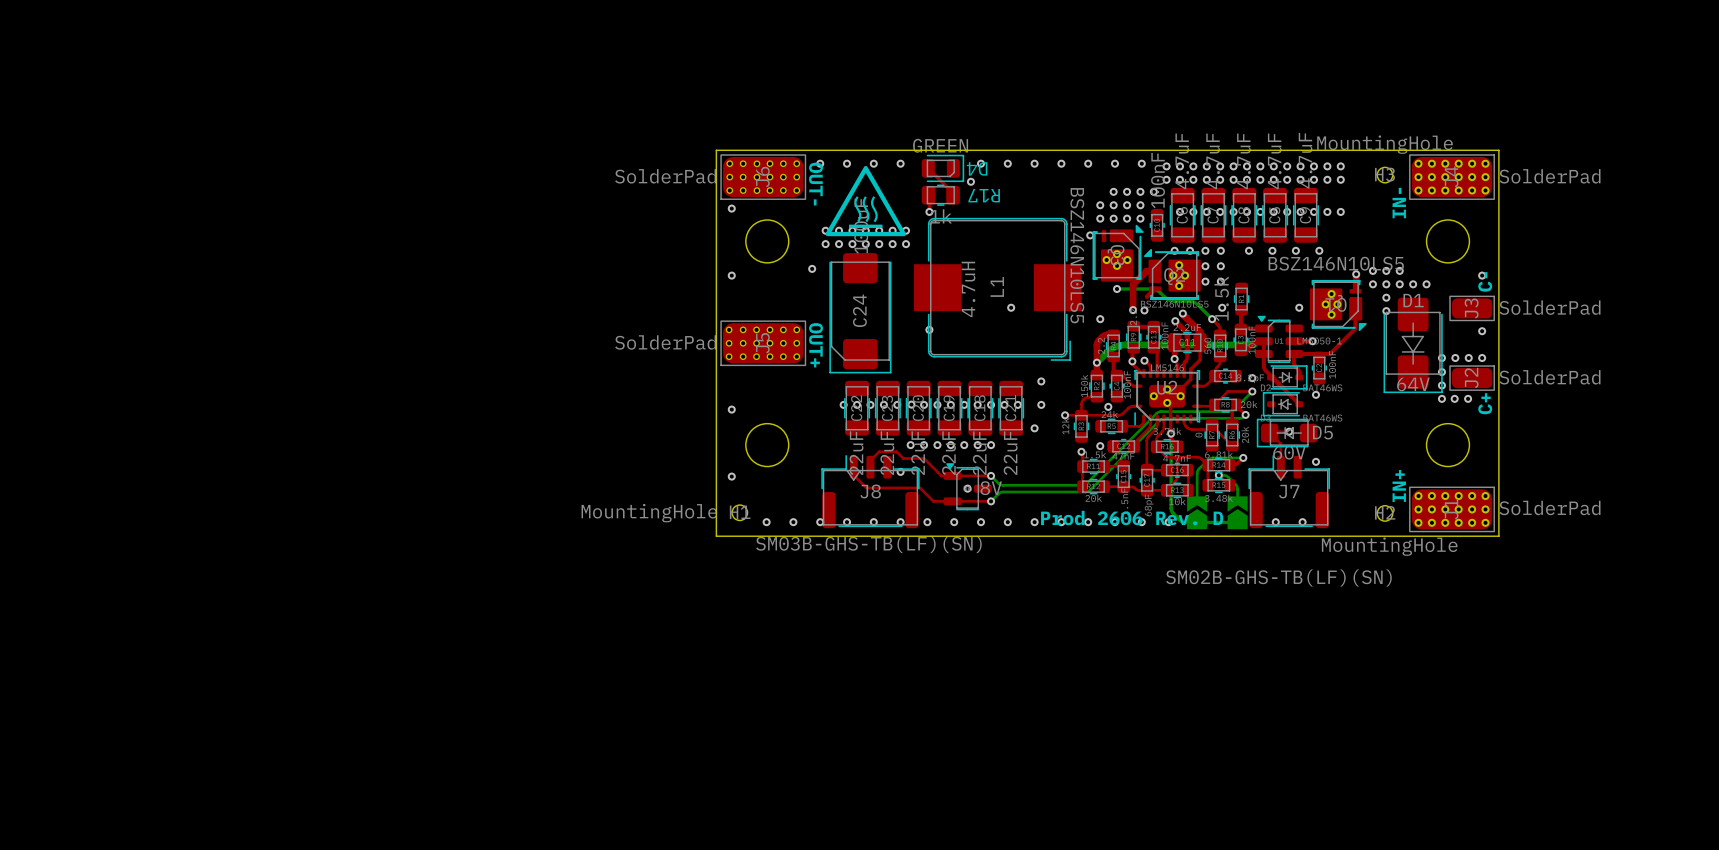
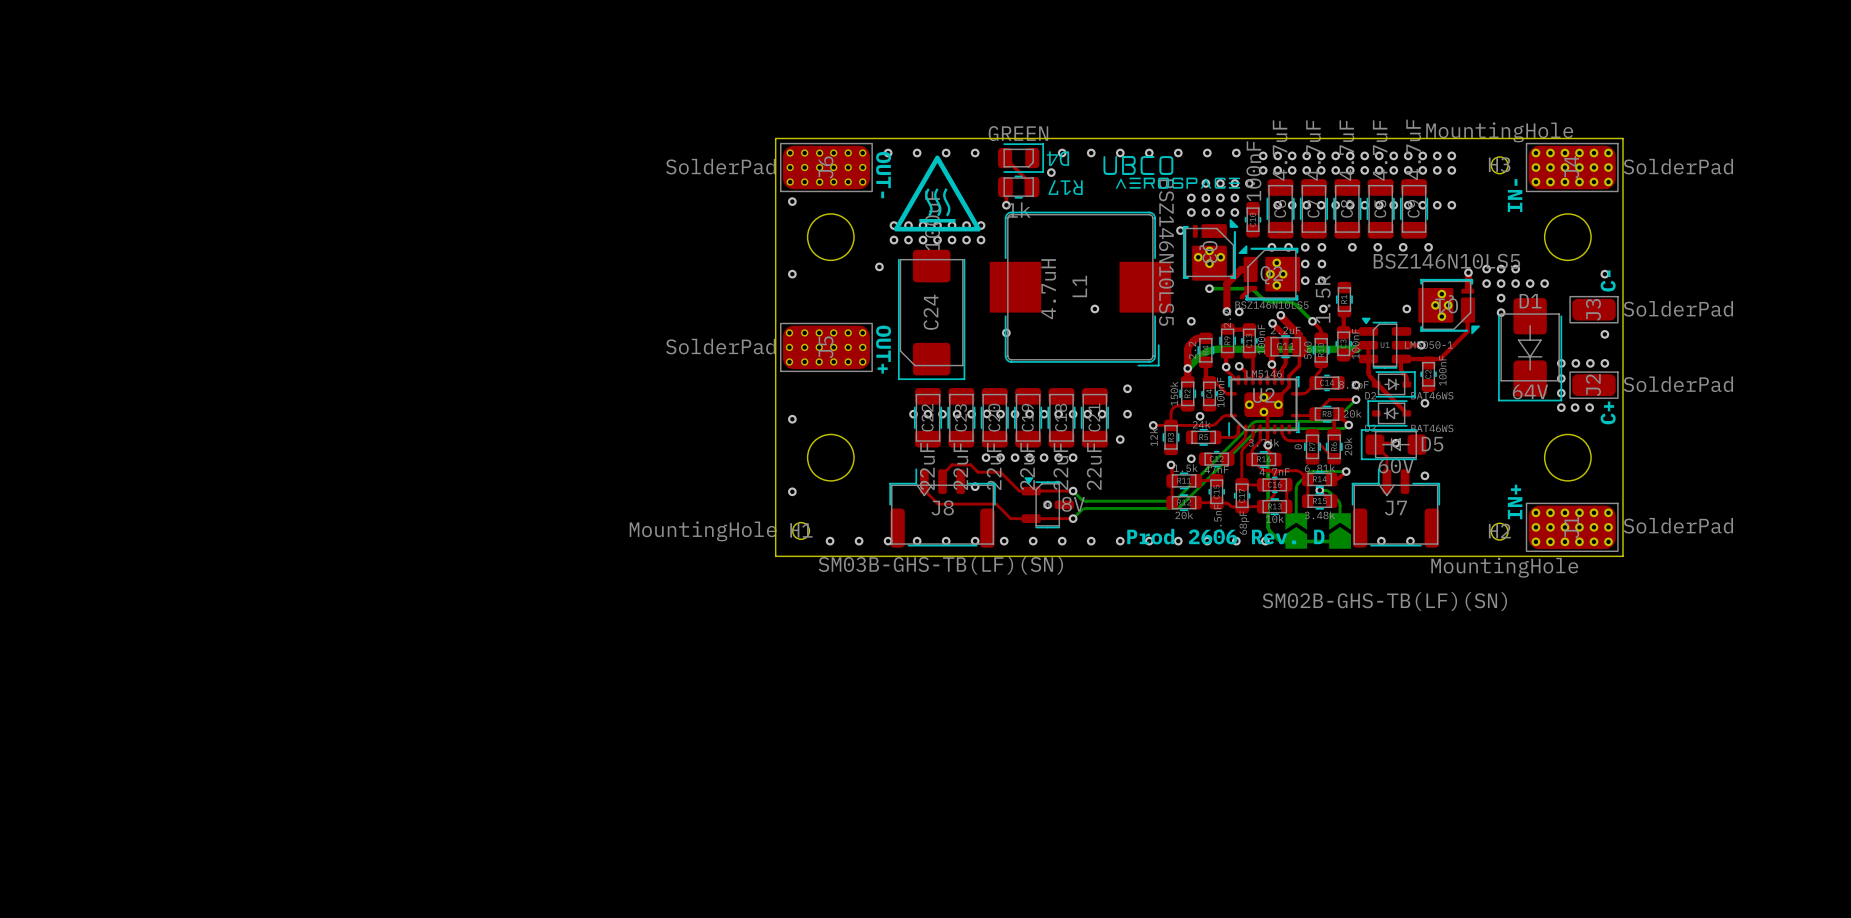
drawing: none -> [1103, 155, 1241, 189]

